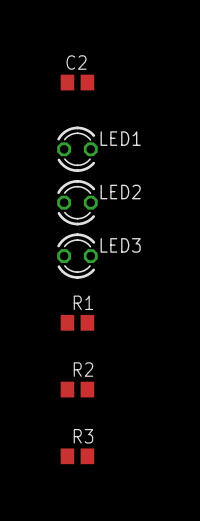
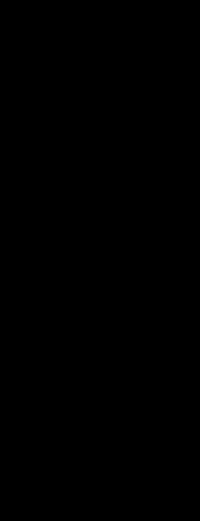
C2: (77, 82) -> none
LED1: (77, 149) -> none
LED2: (77, 202) -> none
LED3: (77, 256) -> none
R1: (77, 322) -> none
R2: (77, 389) -> none
R3: (77, 456) -> none

